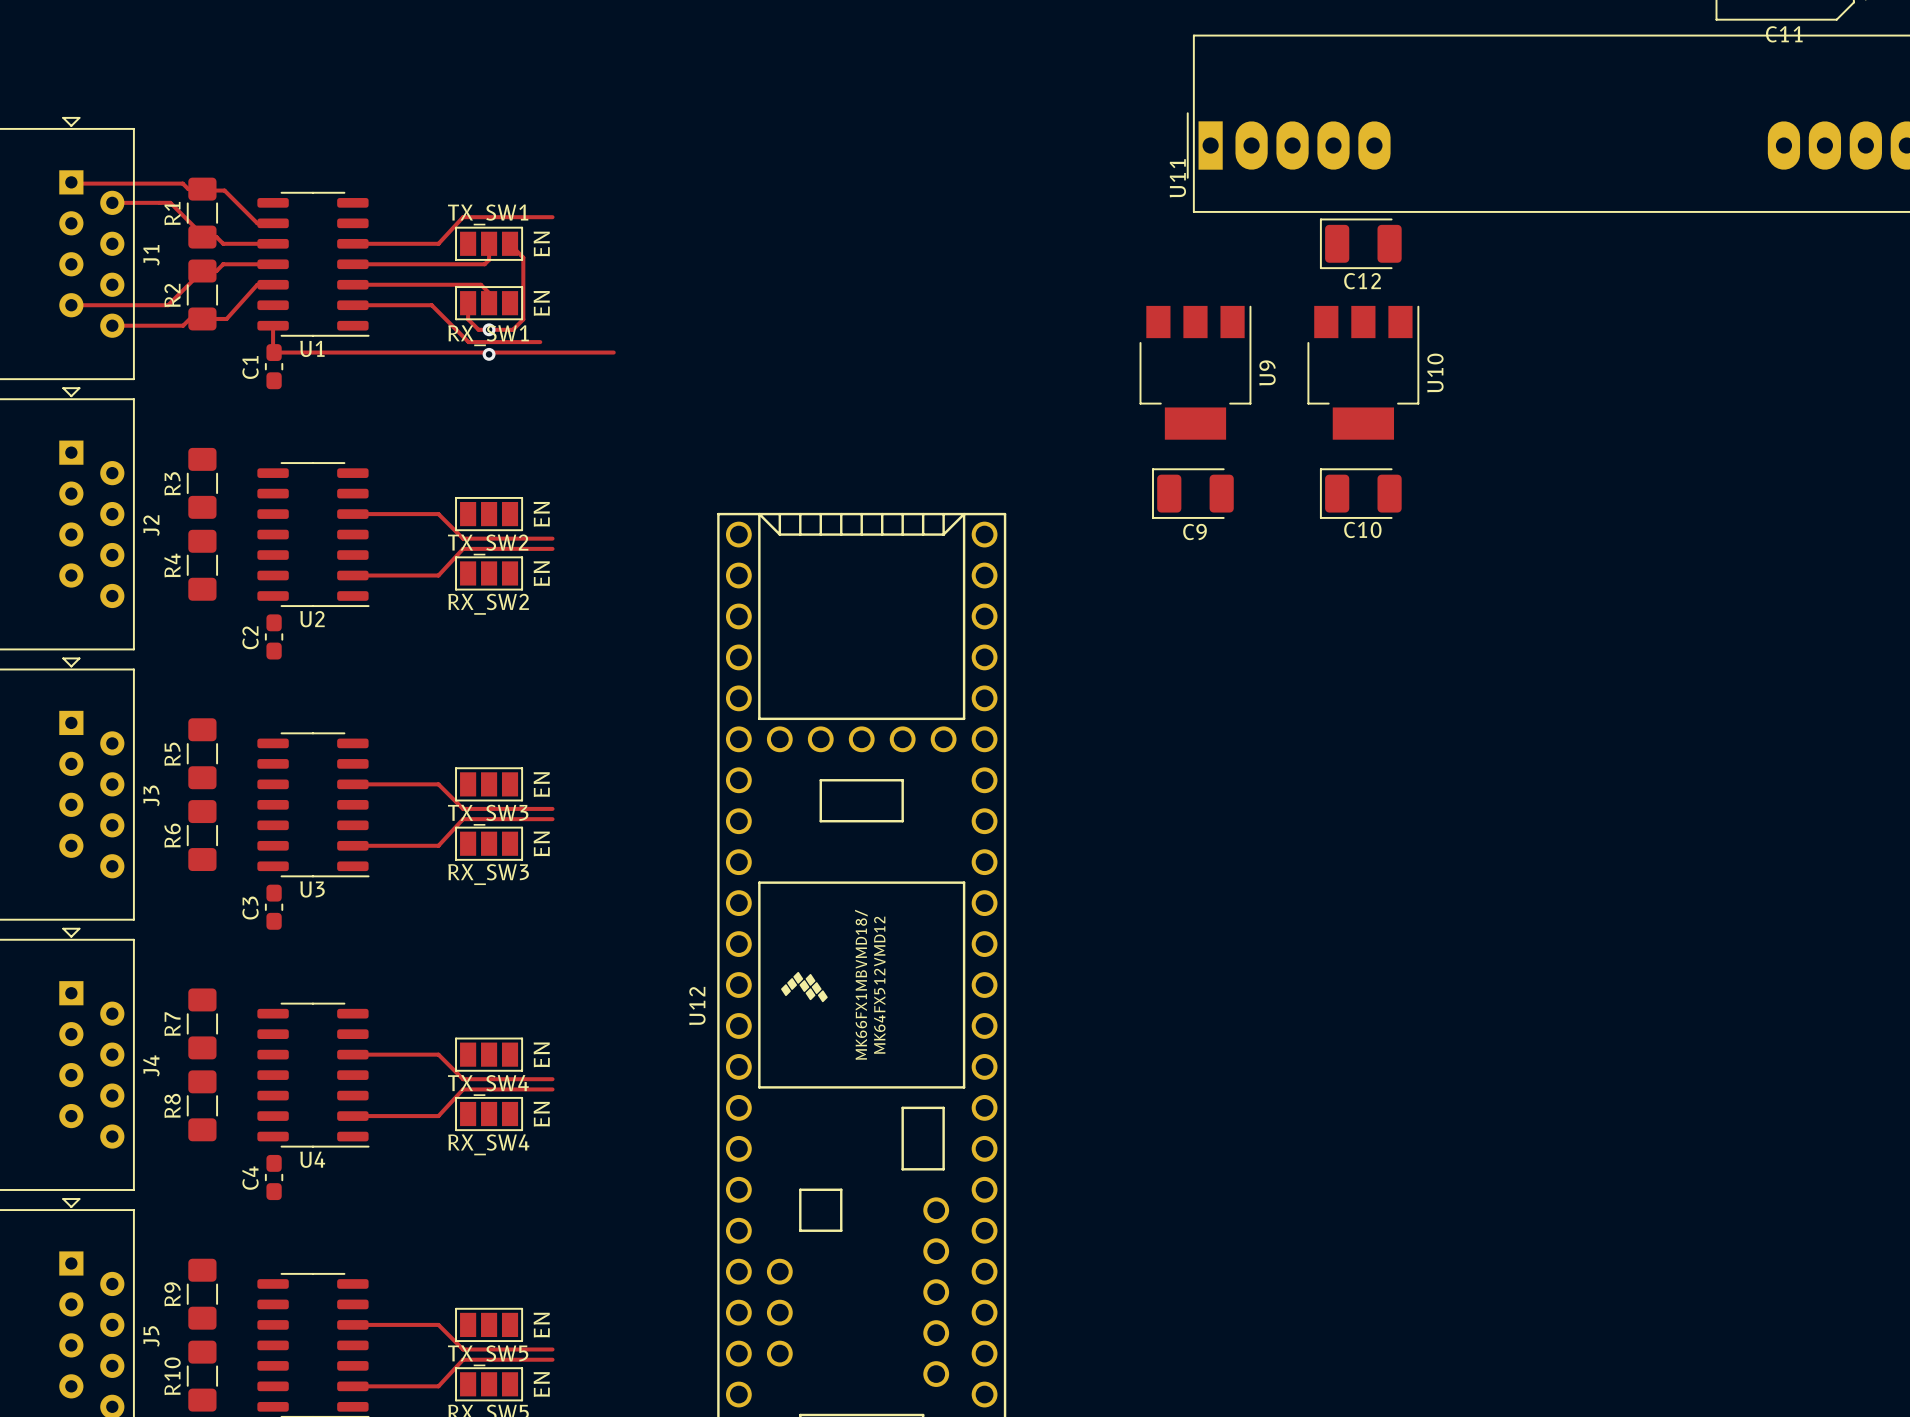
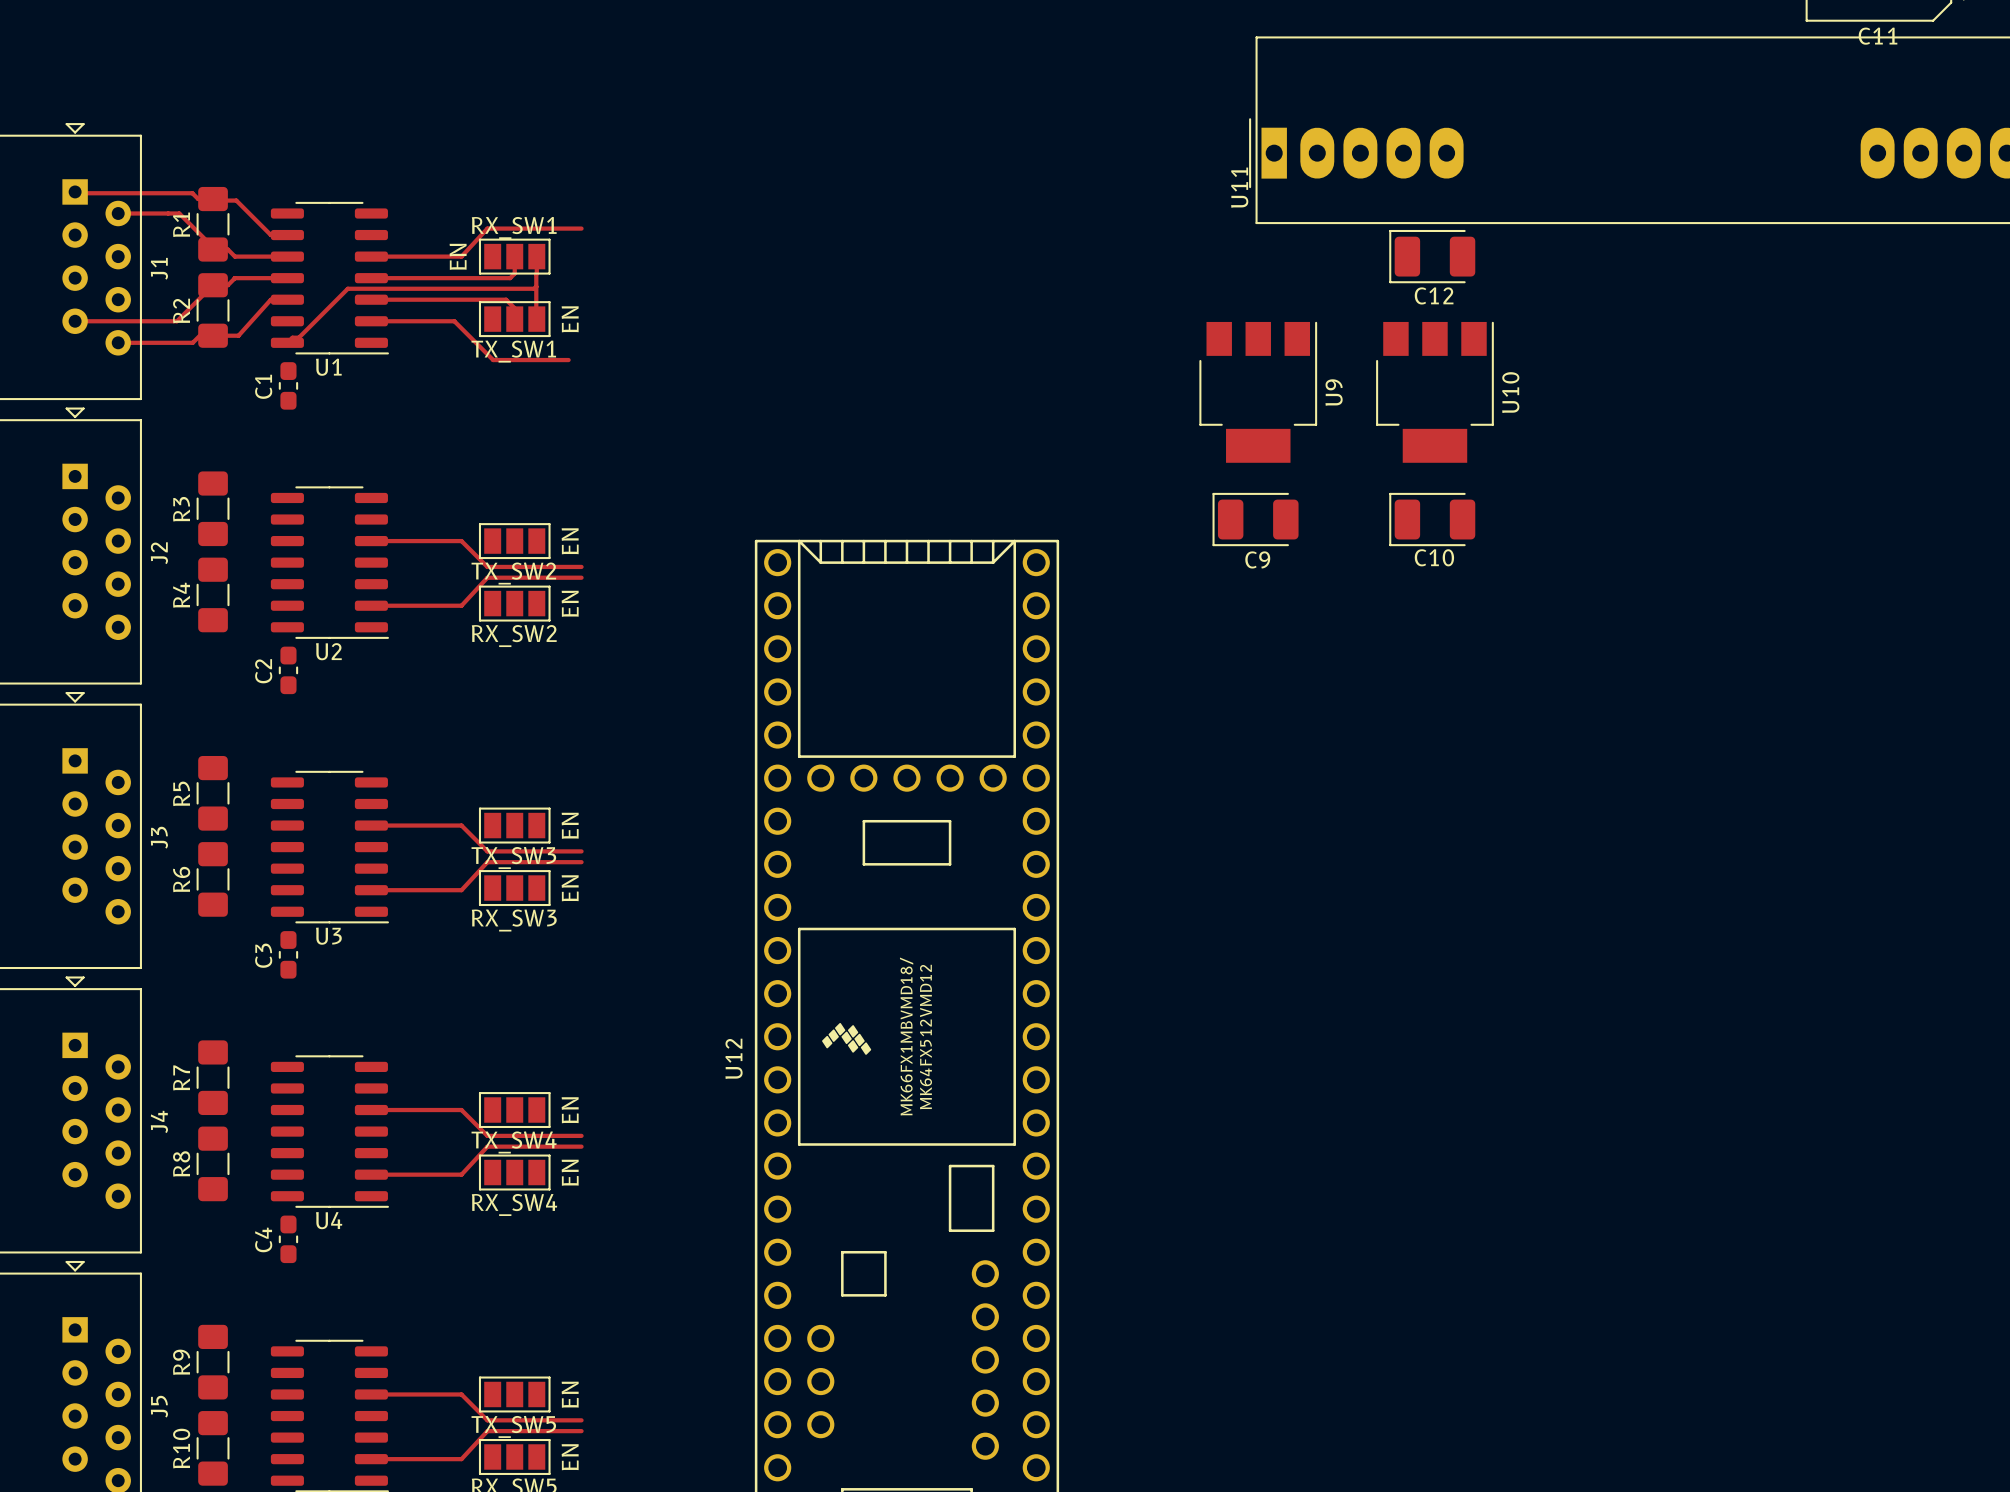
TX_SW1 name: TX_SW1 (488, 214) -> RX_SW1 (514, 227)
TX_SW1 rotation: 0° (489, 243) -> 180° (514, 256)
track: (509, 243) (523, 257) (523, 319) (512, 329) (478, 329) (468, 319) (468, 303) -> (536, 256) (536, 321)
track: (273, 325) (273, 353) -> (287, 342) (292, 337) (298, 337) (347, 288) (534, 288) (536, 286)
via: (489, 329) -> none
RX_SW1 name: RX_SW1 (488, 335) -> TX_SW1 (513, 351)
track: (274, 352) (613, 352) -> none
via: (489, 354) -> none

